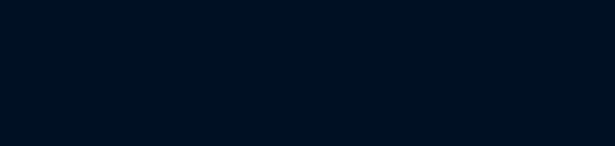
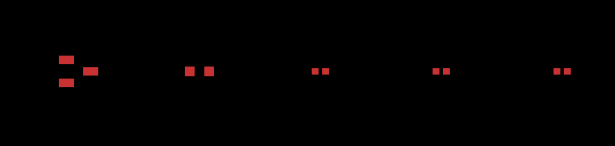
part: none -> (78, 71)
part: none -> (199, 71)
part: none -> (320, 71)
part: none -> (441, 71)
part: none -> (562, 71)

